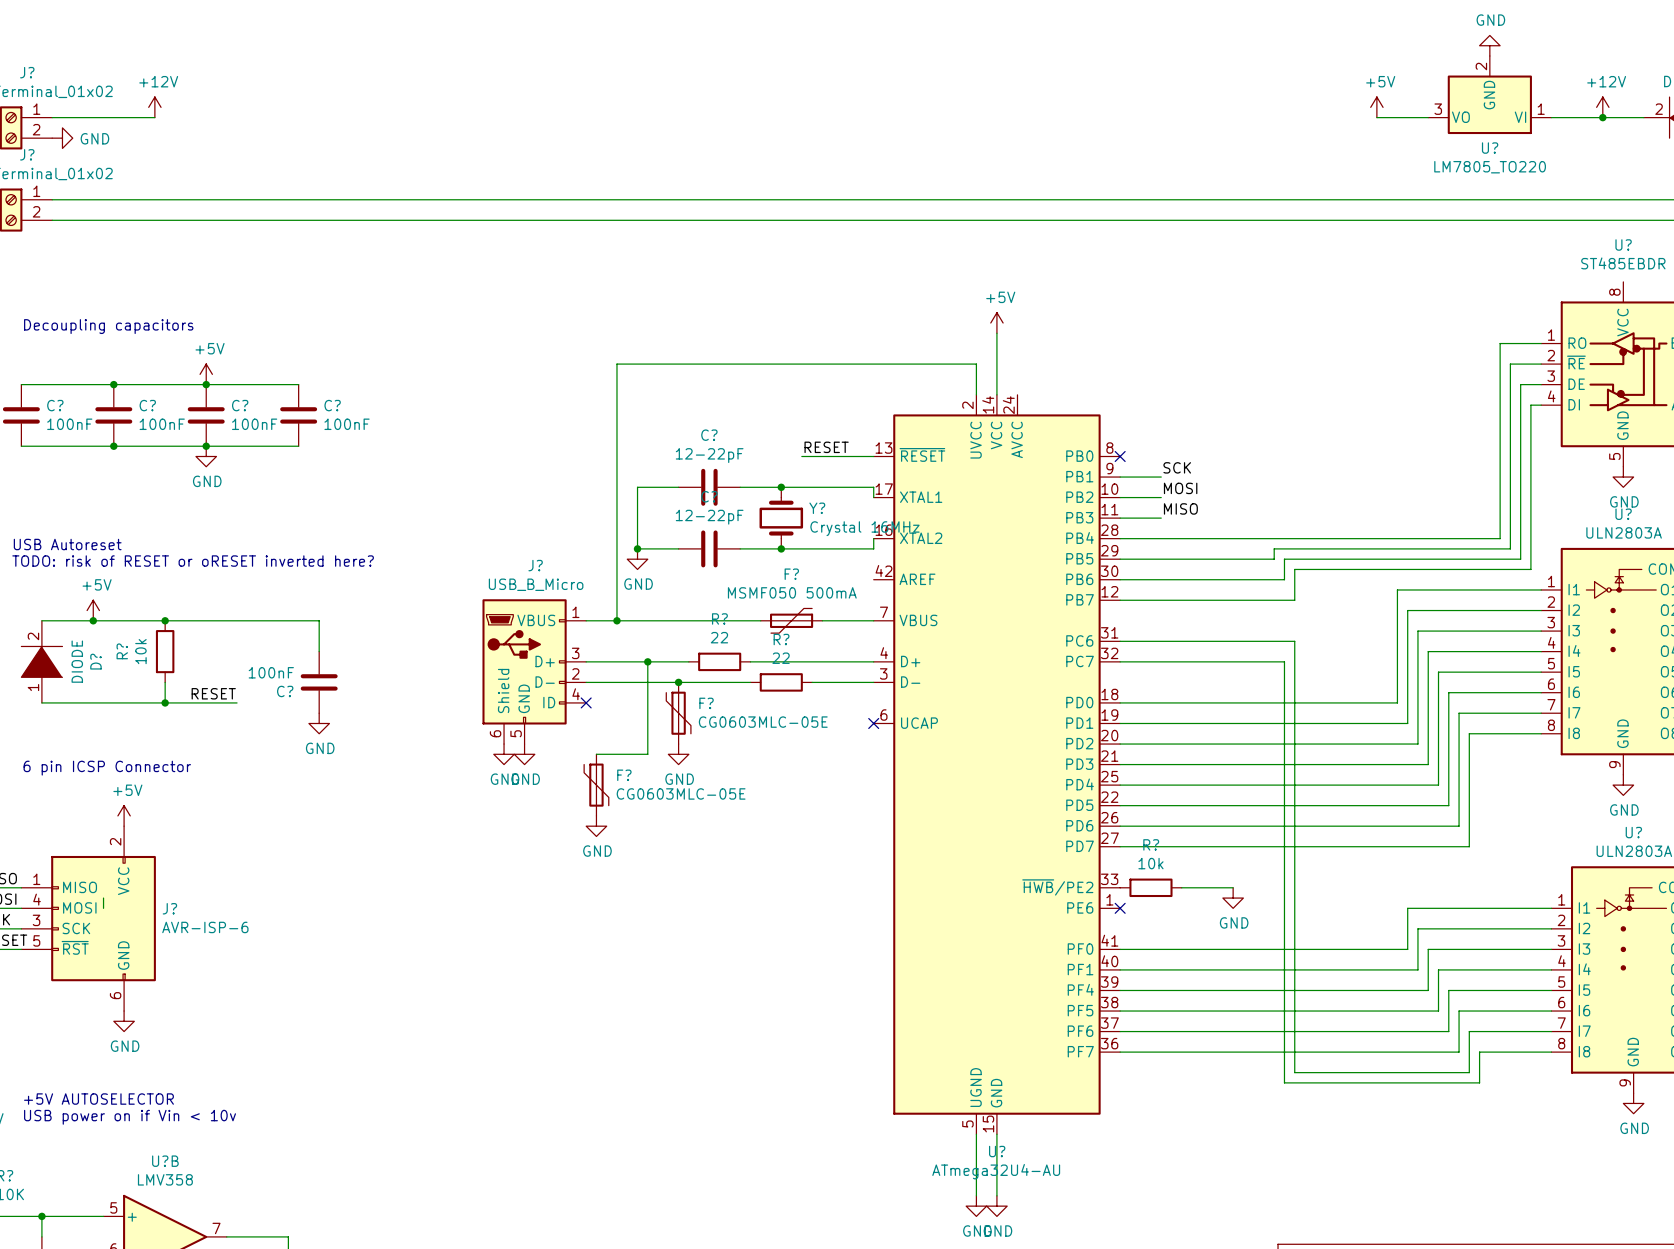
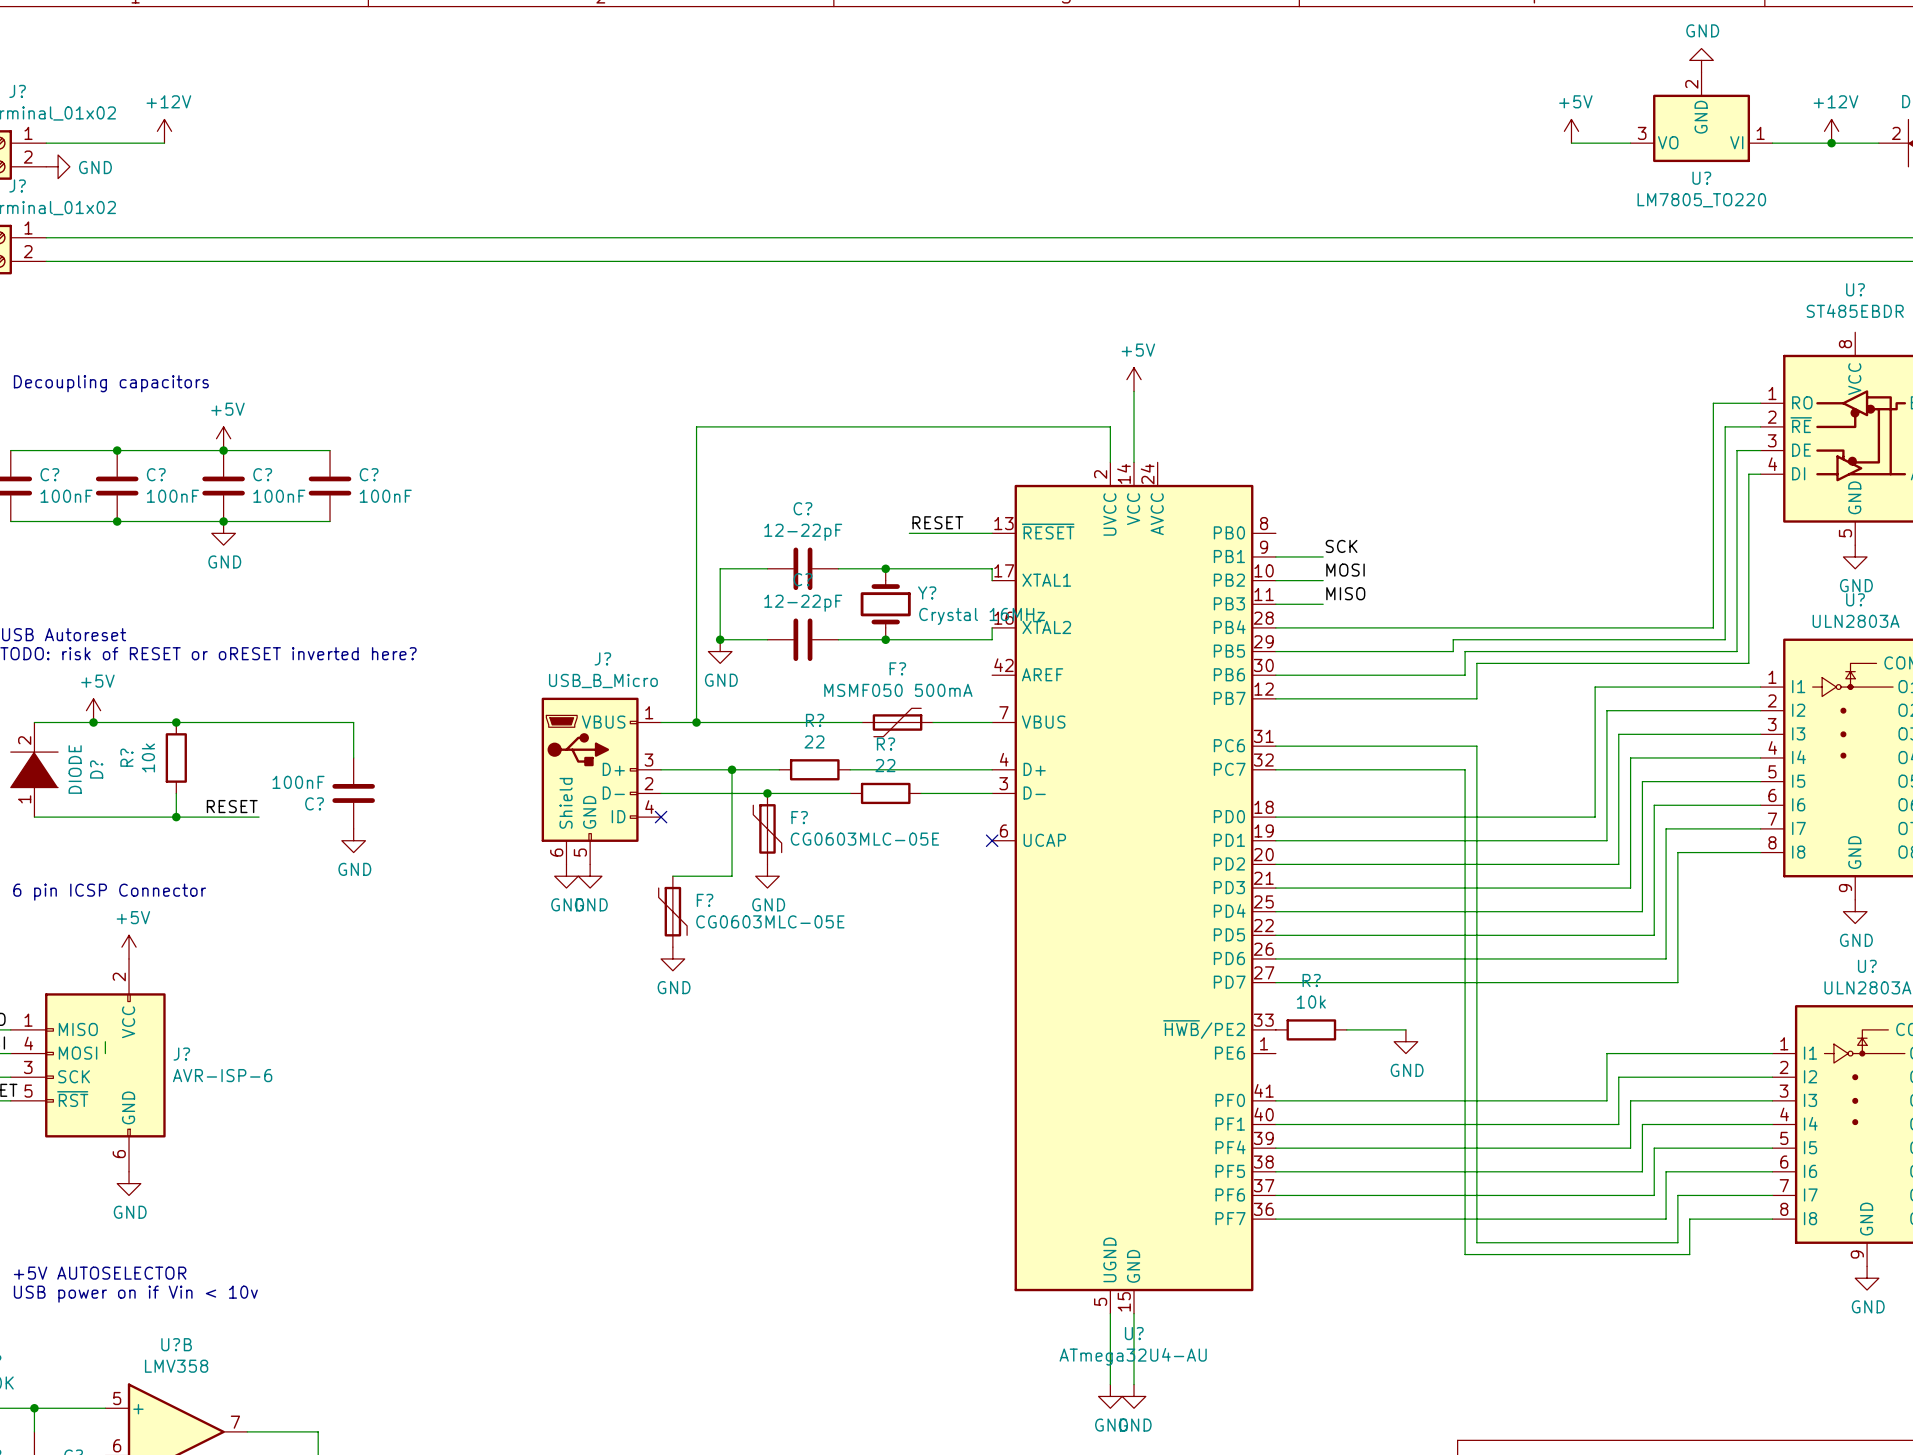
no-connect mark: (1120, 456) -> none
no-connect mark: (1120, 908) -> none

